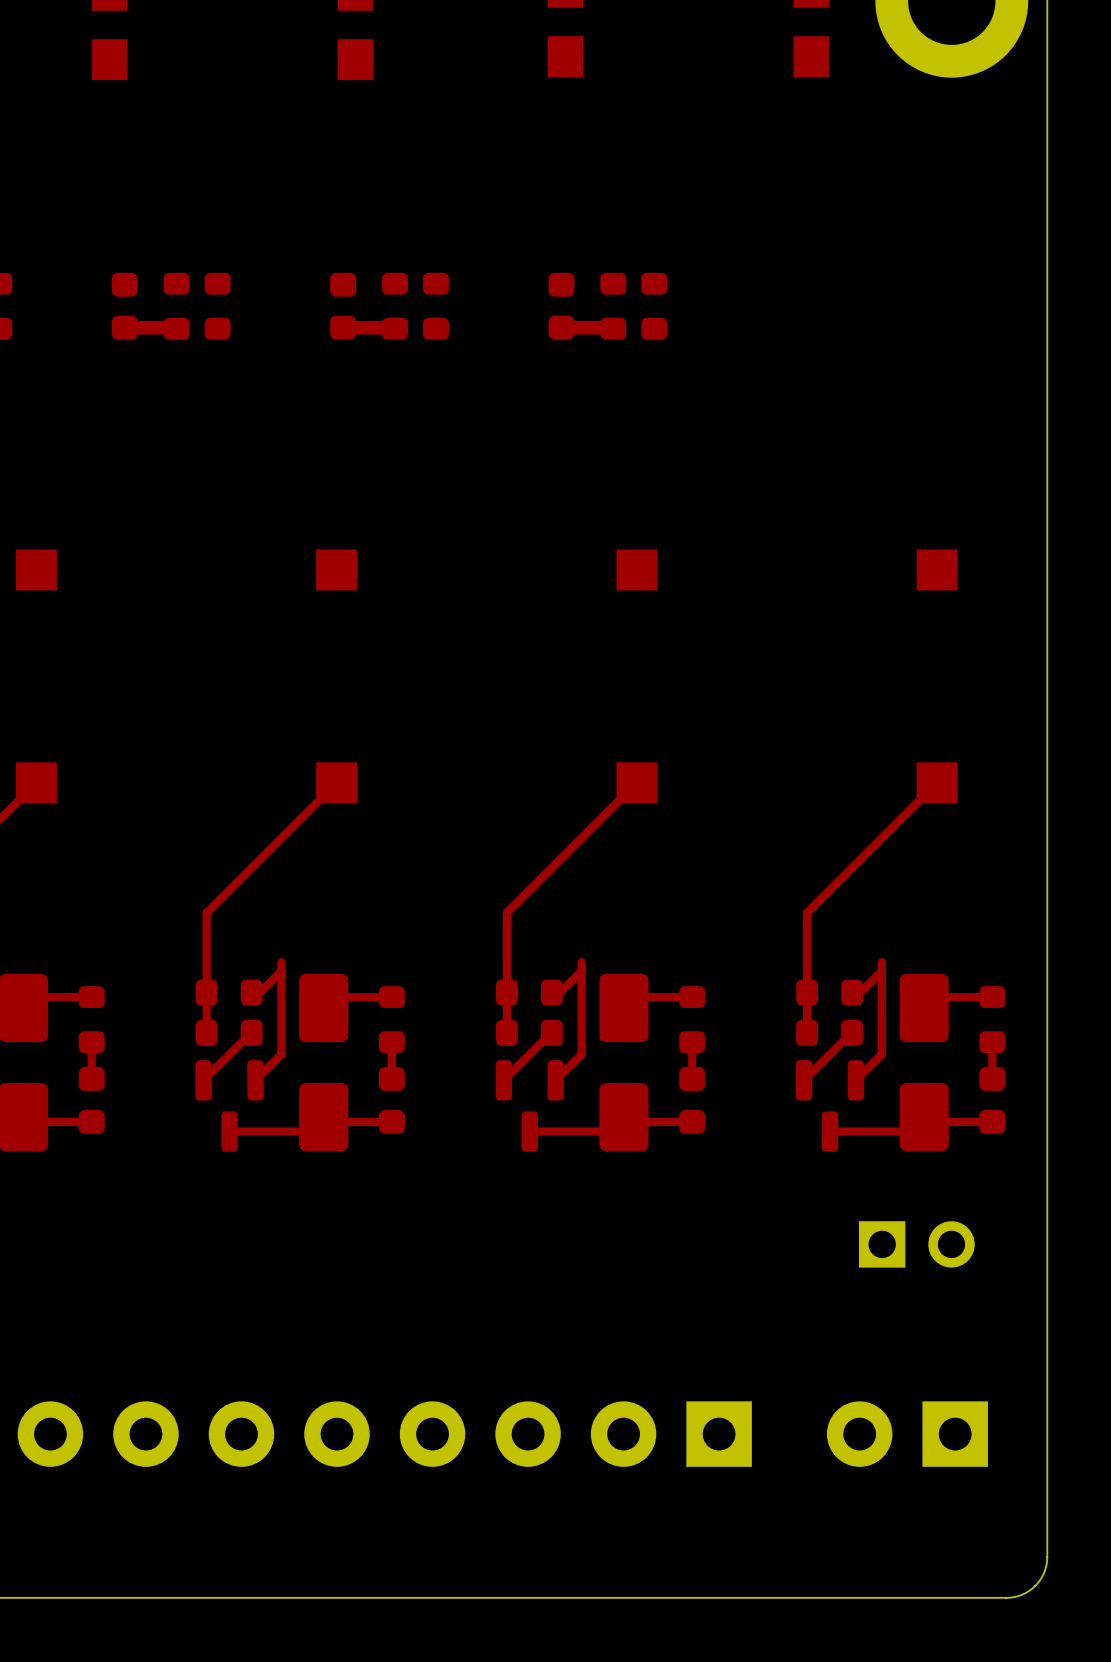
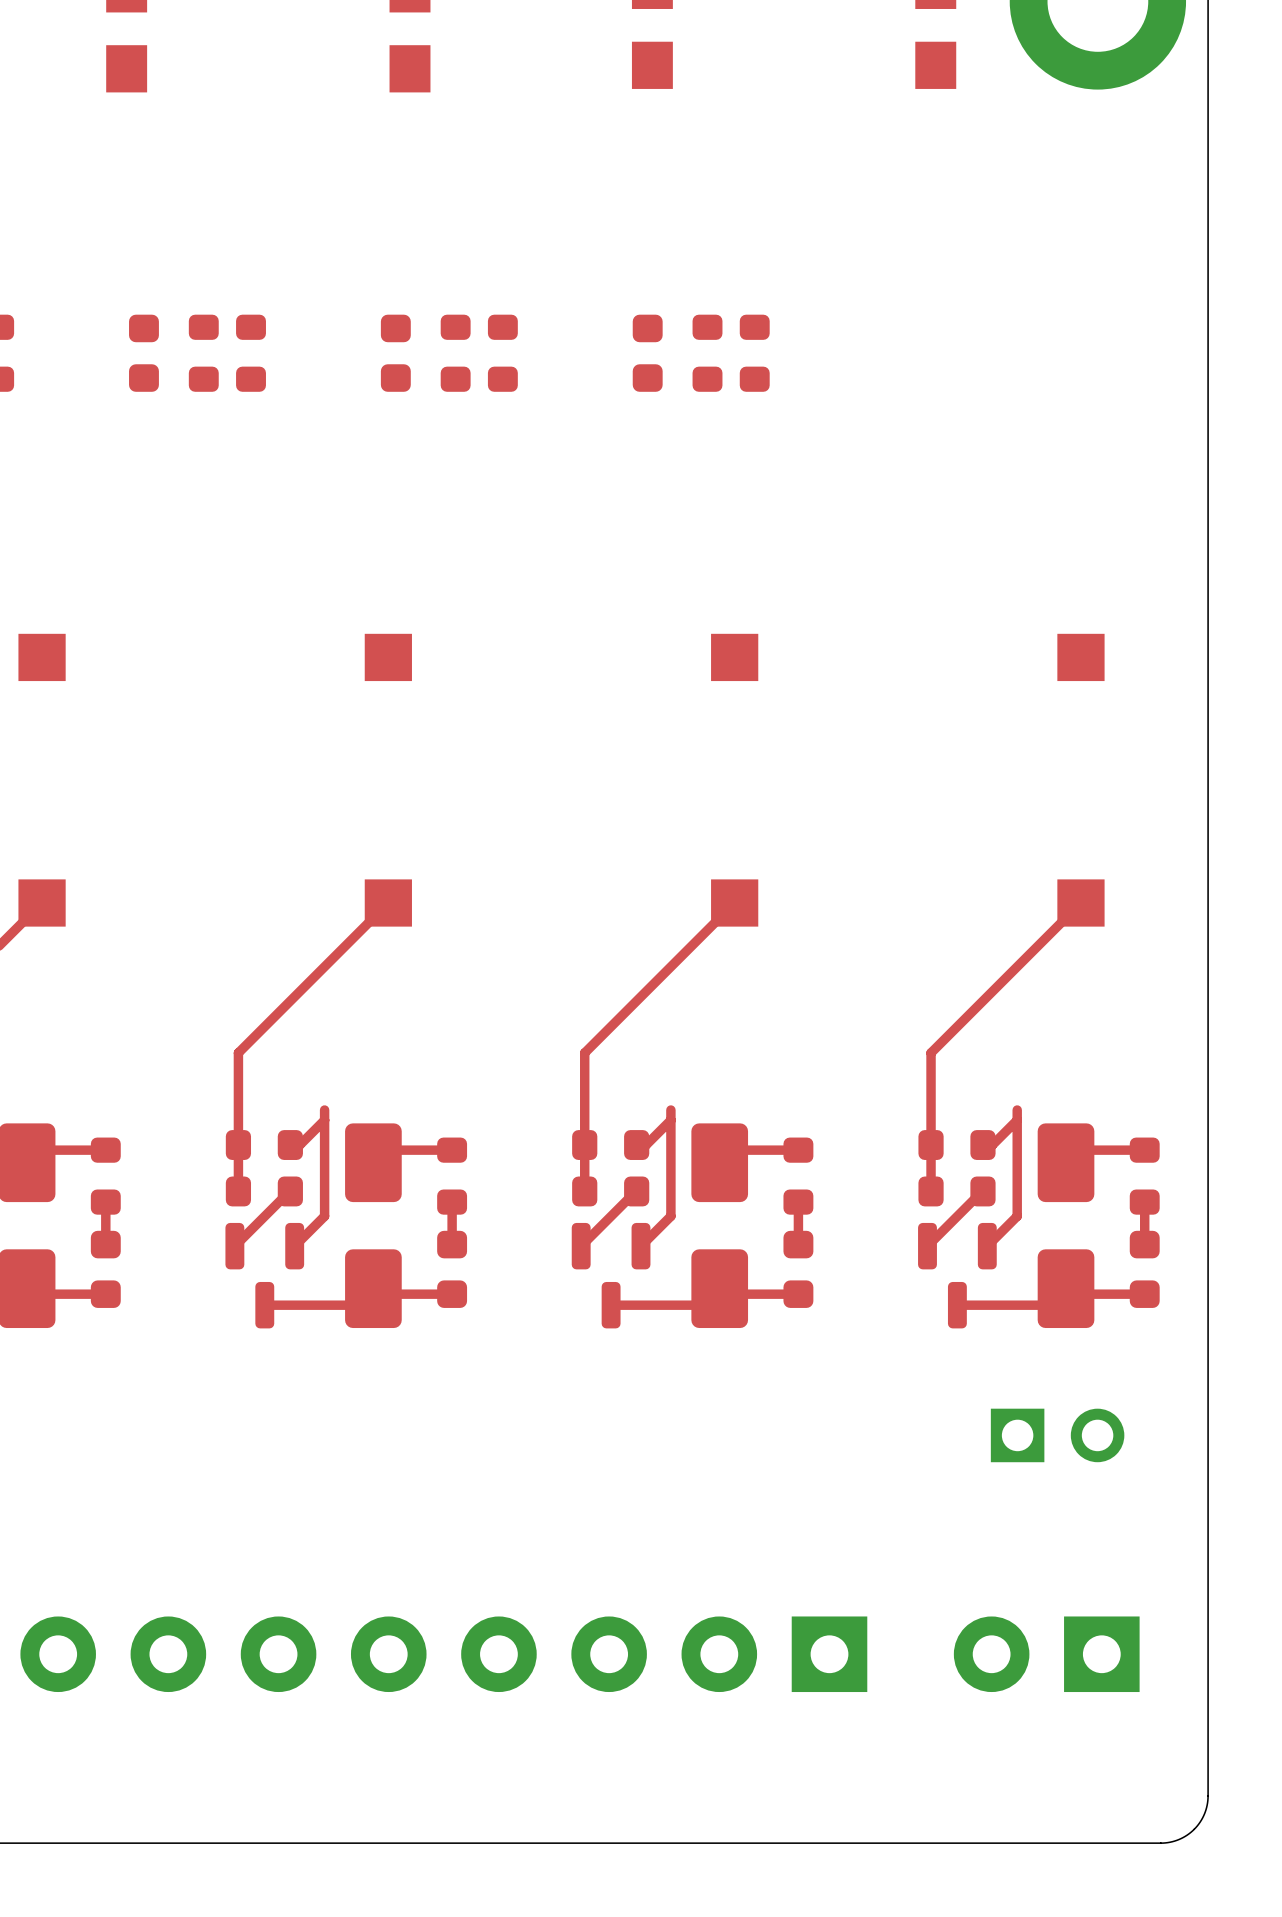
top track: (124, 327) (176, 328) -> none
top track: (343, 327) (395, 328) -> none
top track: (561, 327) (613, 328) -> none

